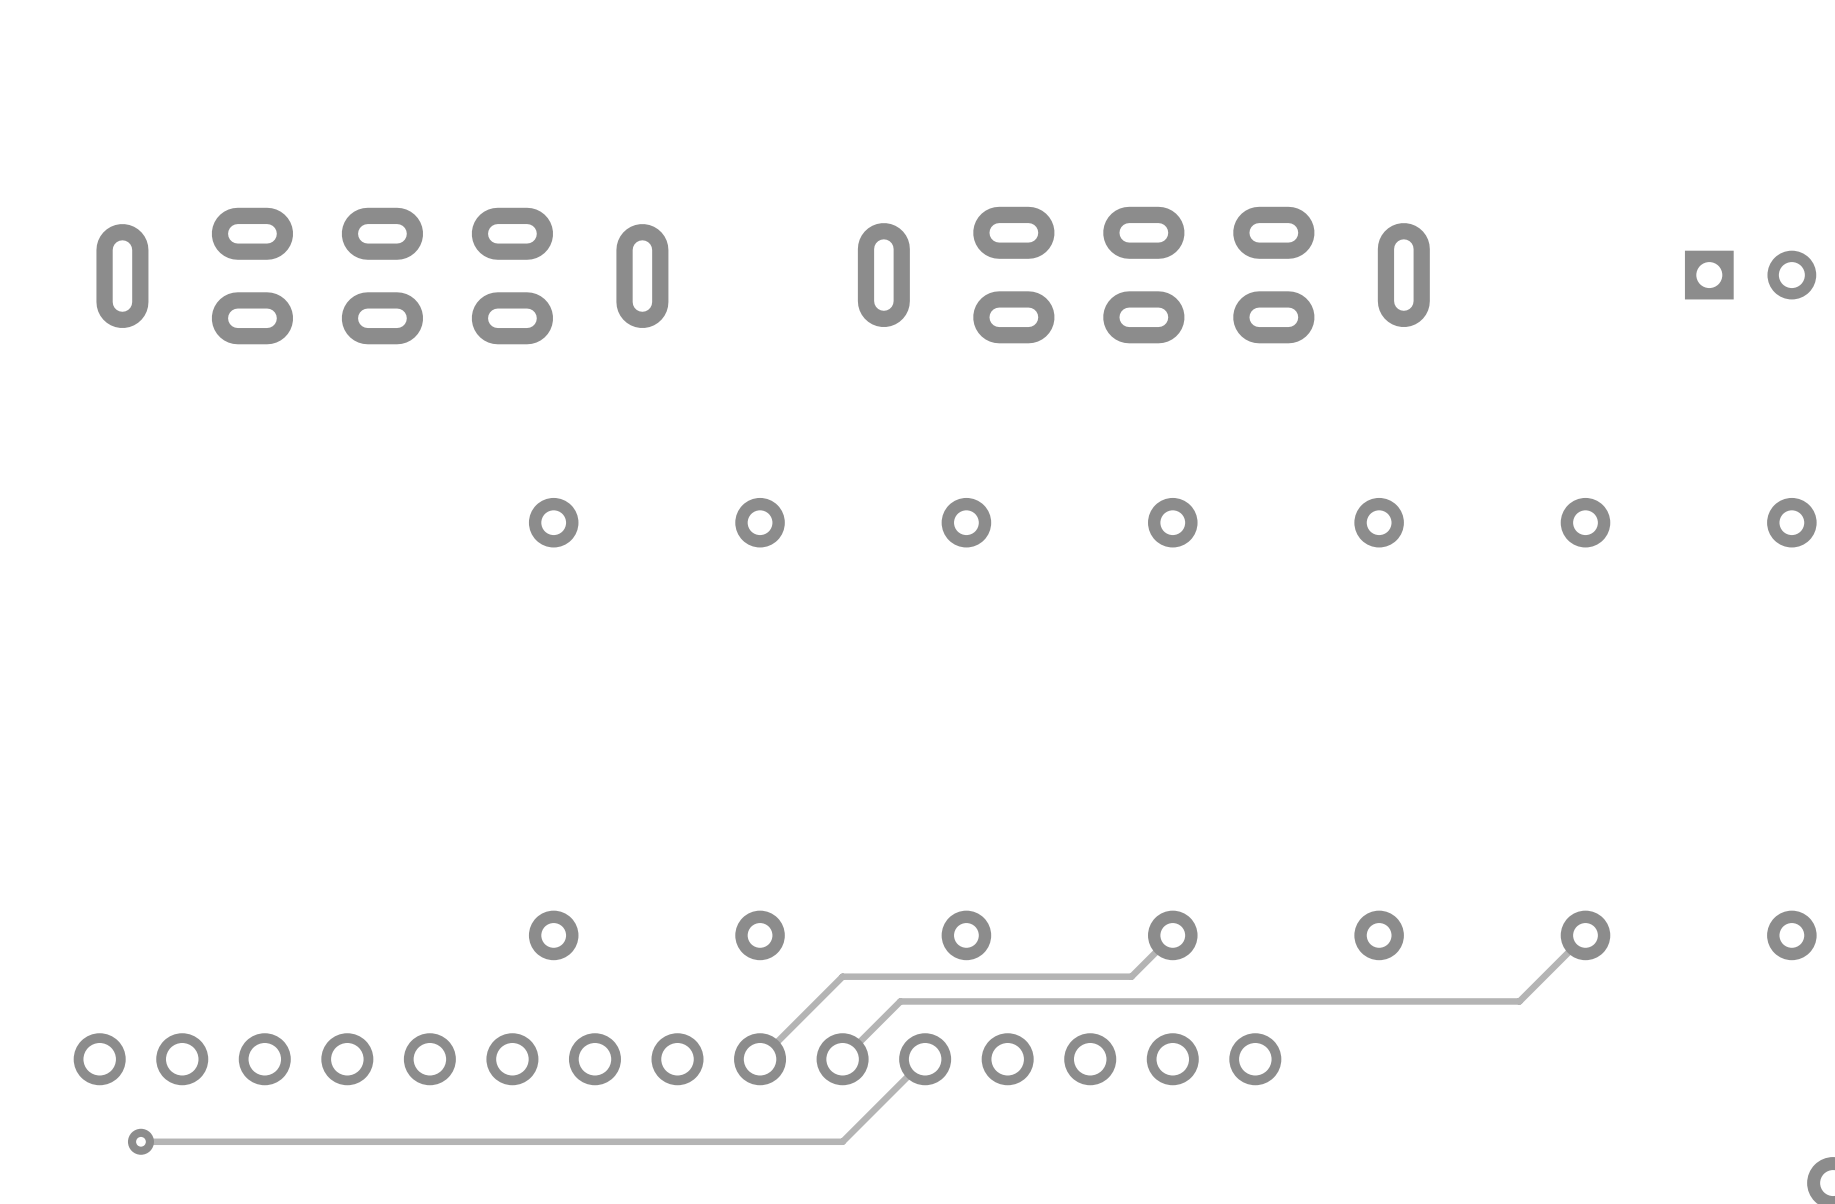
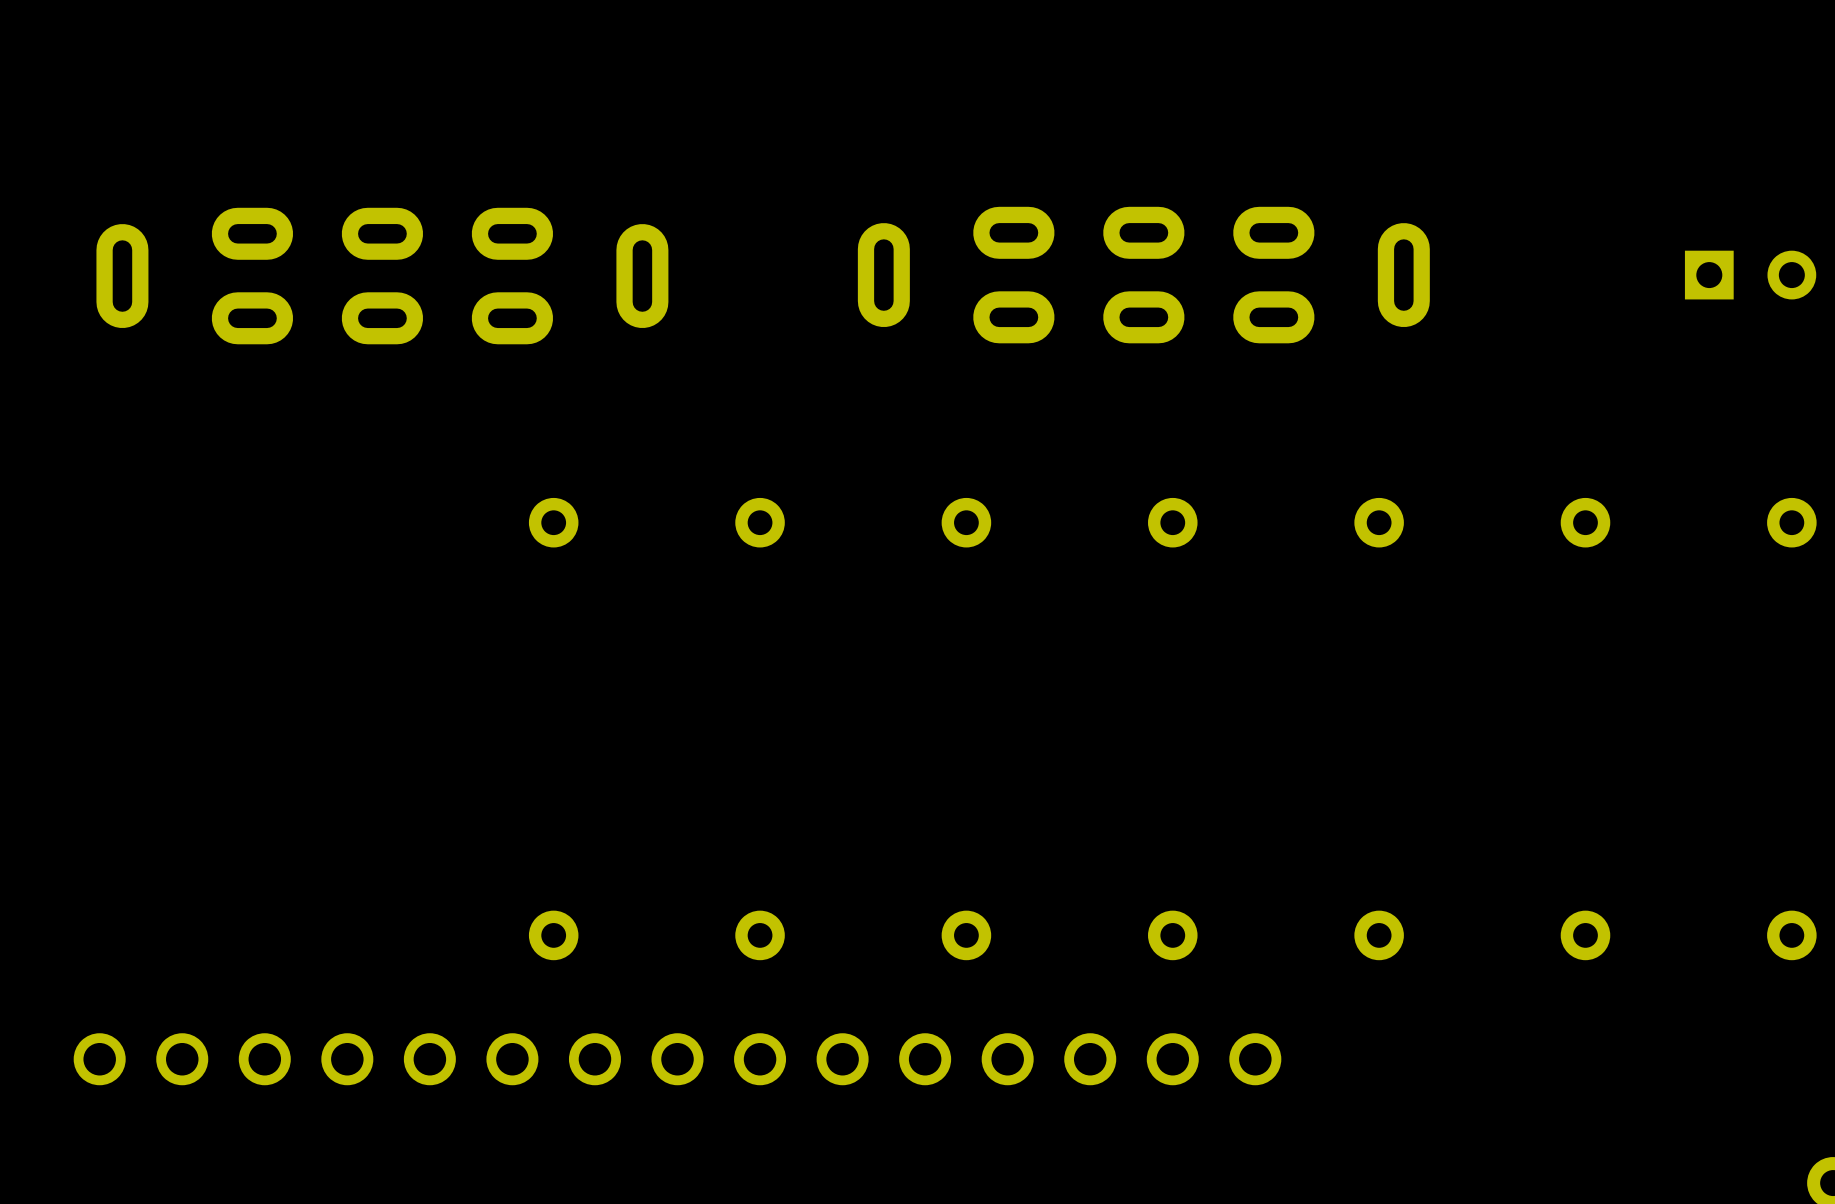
track: (1172, 935) (1131, 976) (842, 976) (760, 1059) -> none
track: (1585, 935) (1519, 1001) (900, 1001) (842, 1059) -> none
track: (925, 1059) (842, 1141) (140, 1141) -> none
via: (140, 1141) -> none

